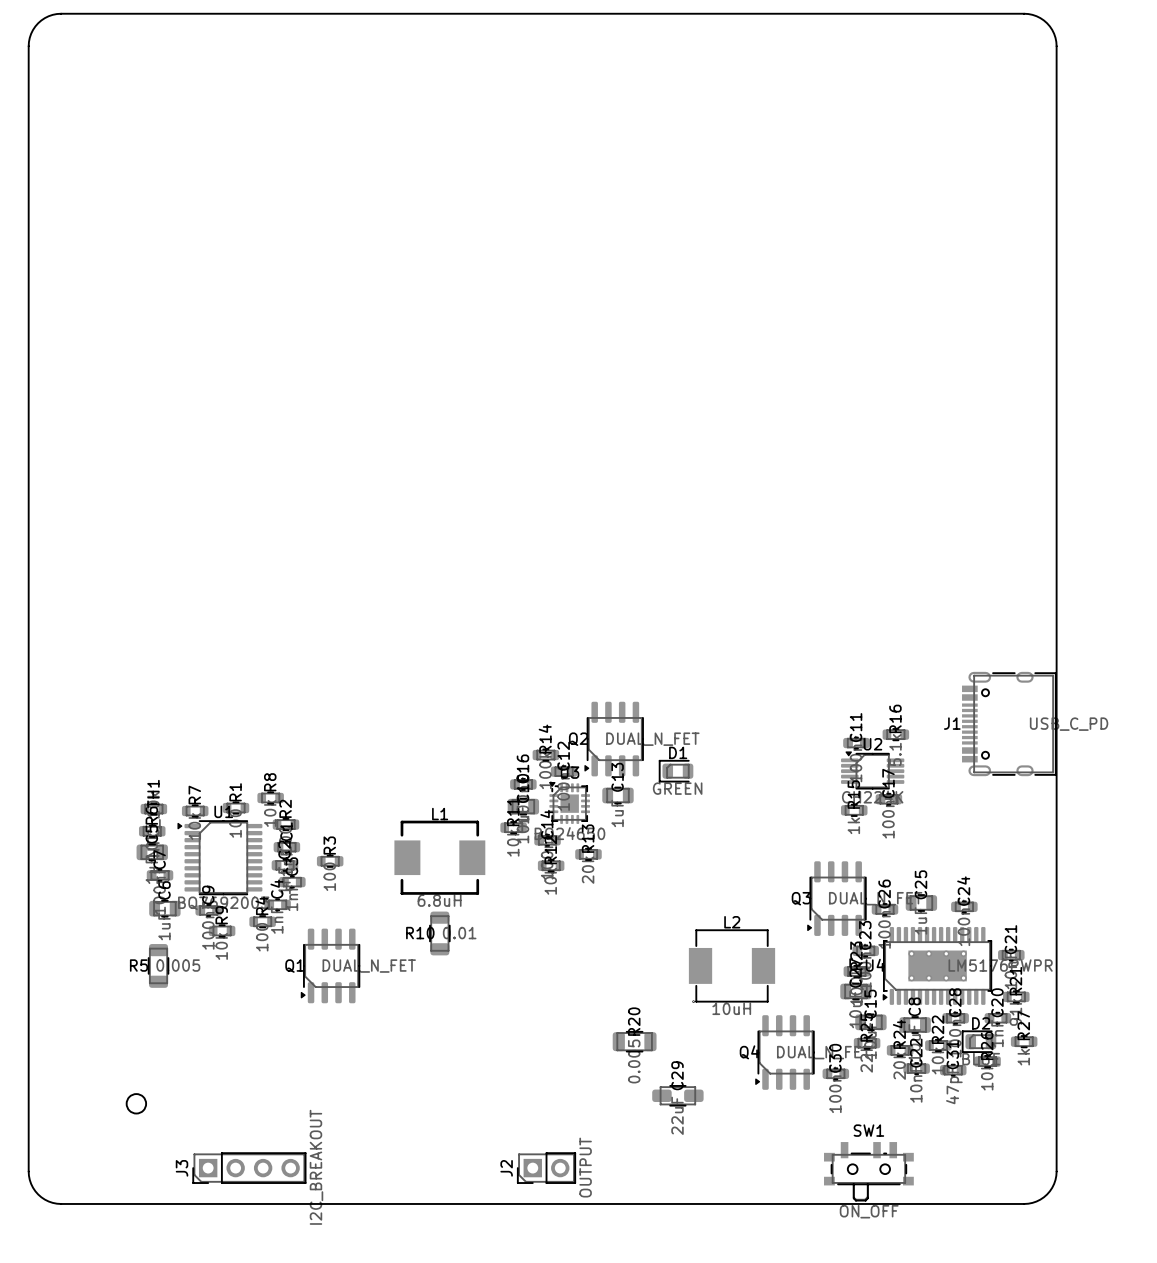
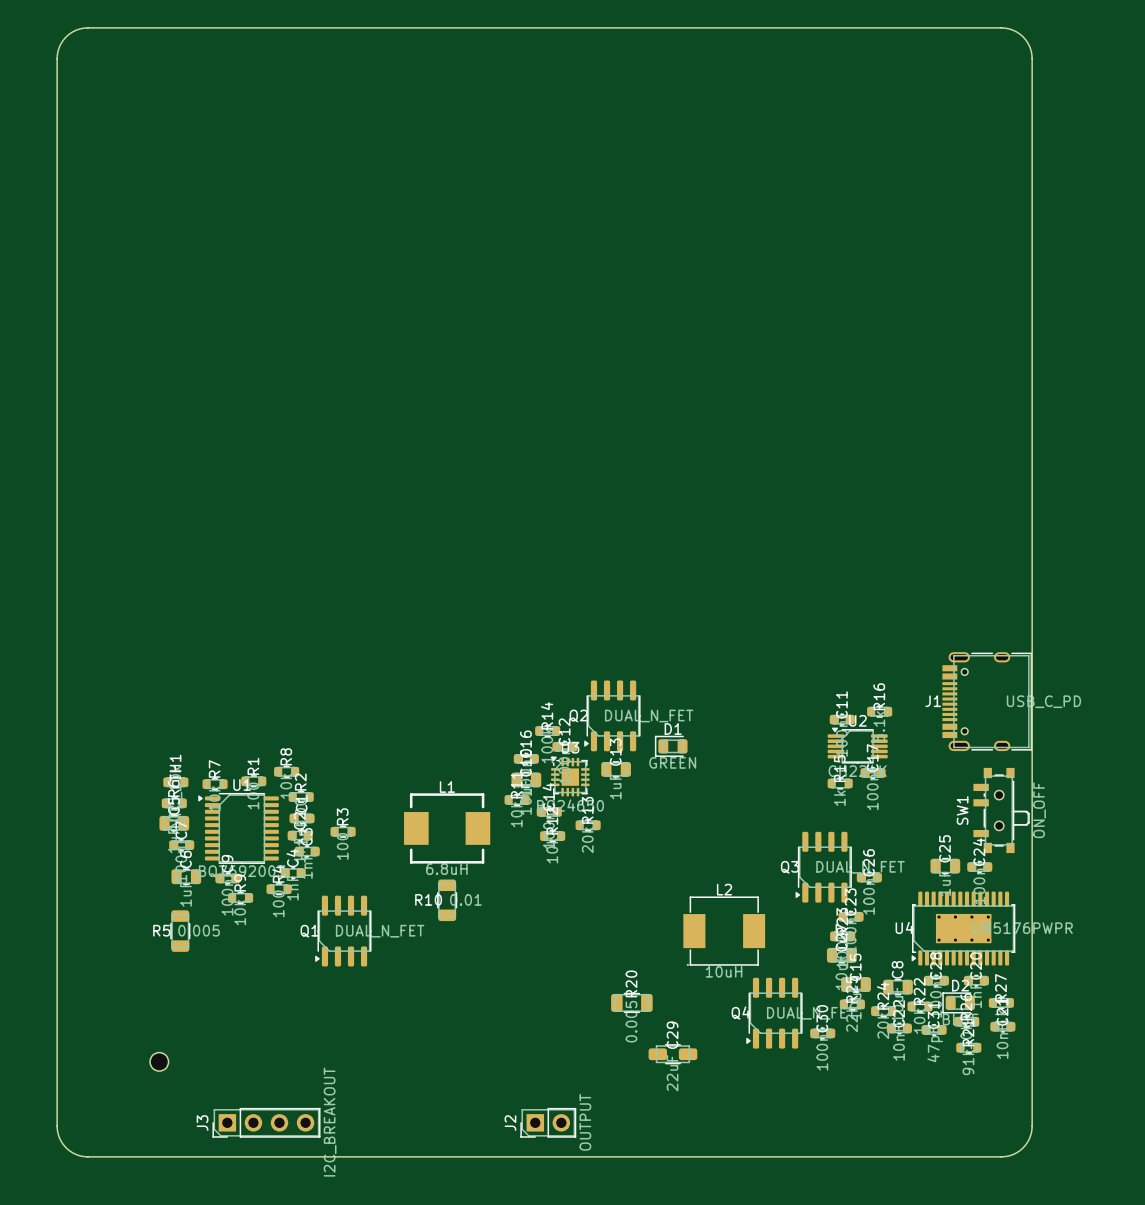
C25 position: (921, 903) -> (945, 866)
C24 position: (964, 906) -> (979, 867)
C21 position: (1011, 955) -> (1002, 1026)
U4 position: (937, 965) -> (963, 928)
R21 position: (1016, 996) -> (968, 1047)
SW1 rotation: 0° (868, 1171) -> 90° counterclockwise (1001, 810)
SW1 position: (868, 1171) -> (1001, 810)

